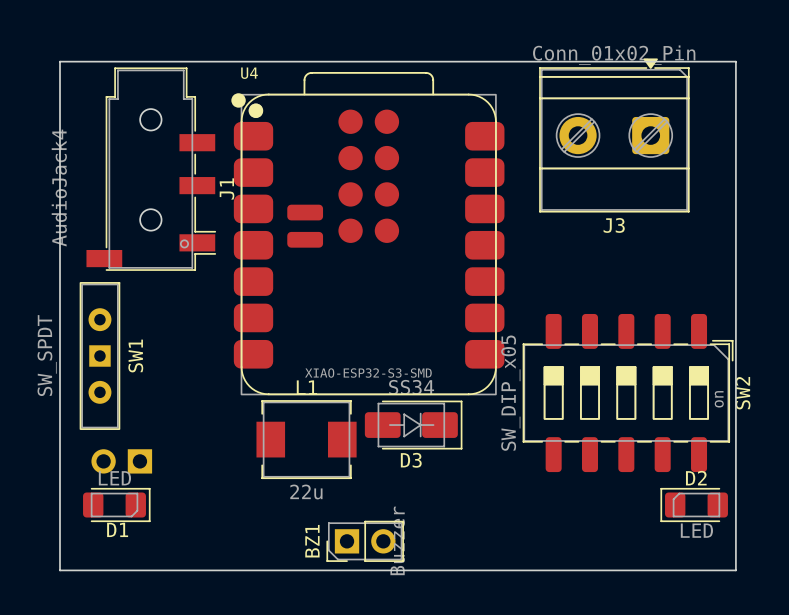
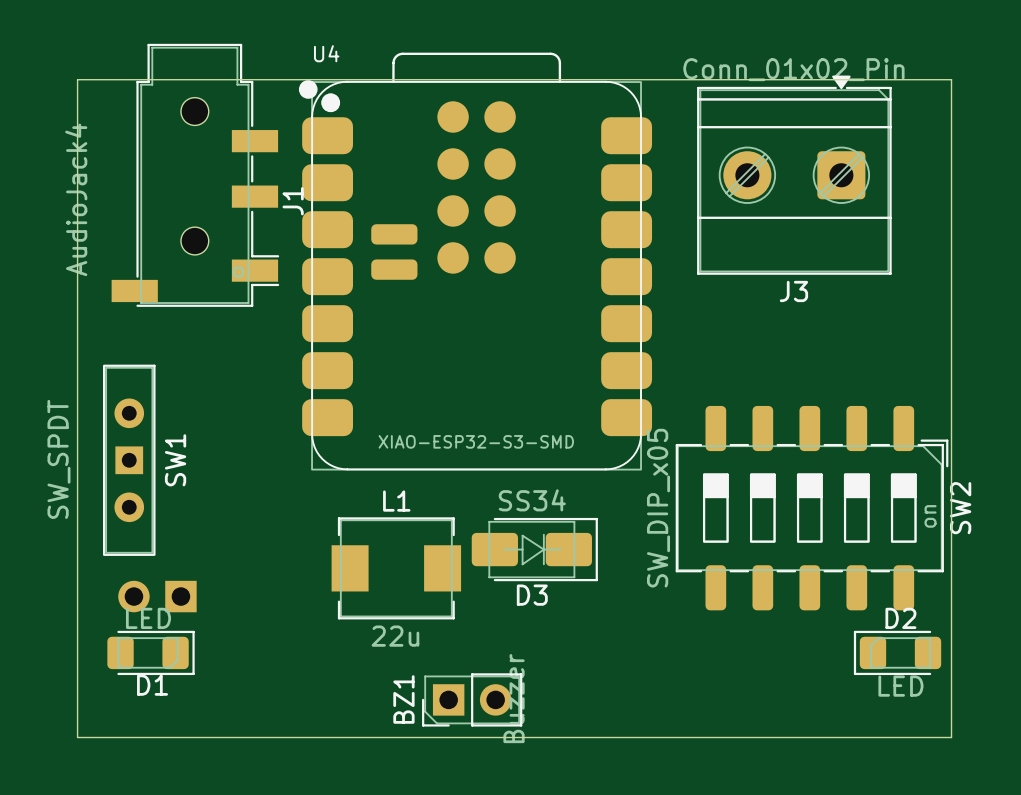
J1 position: (151, 169) -> (195, 175)
U4 position: (367, 233) -> (475, 261)

